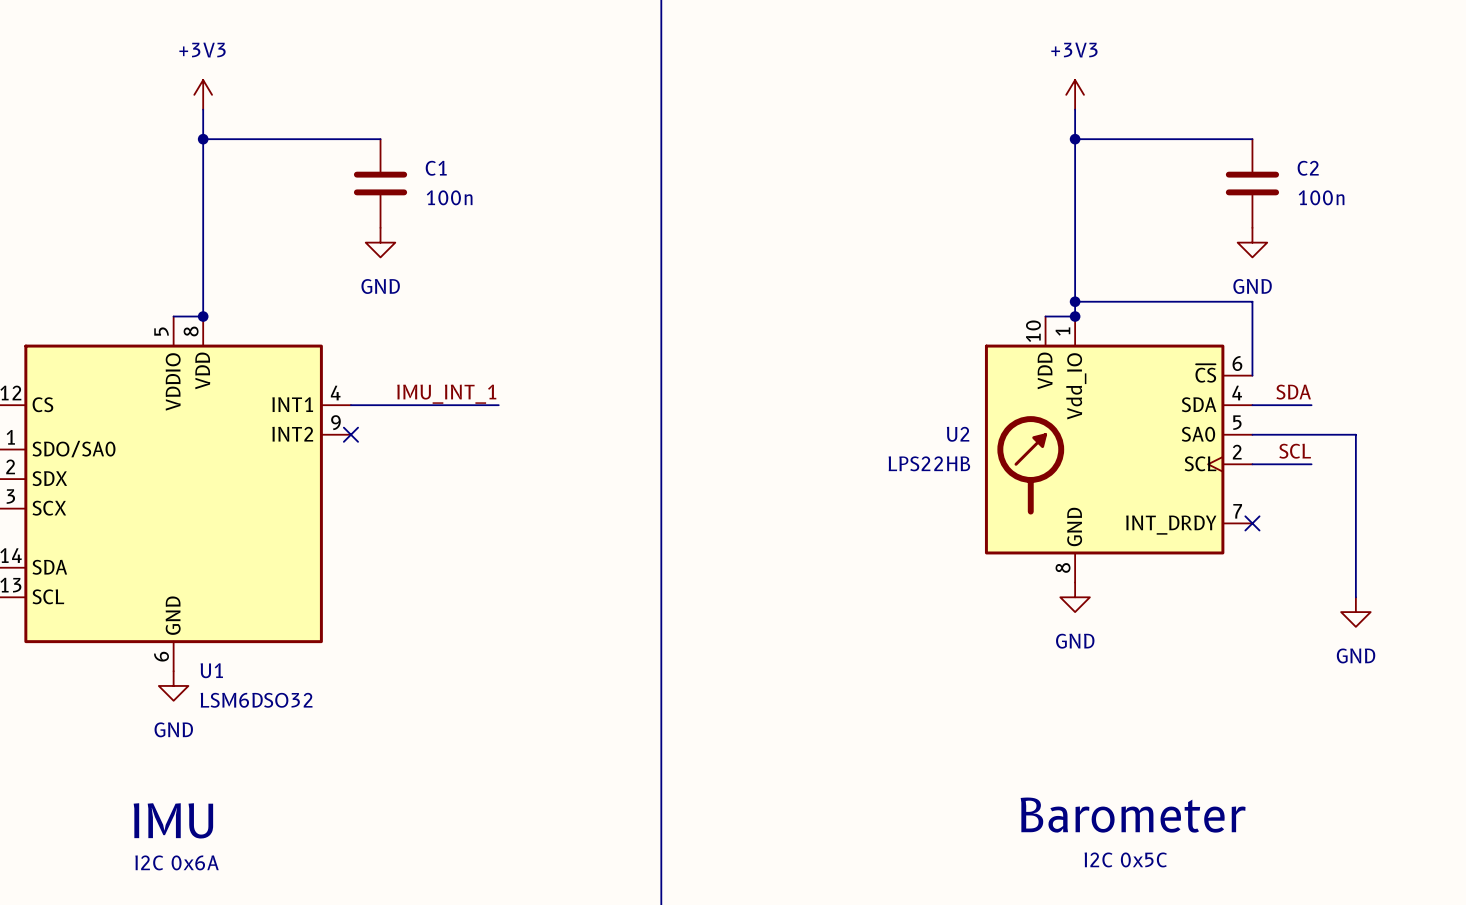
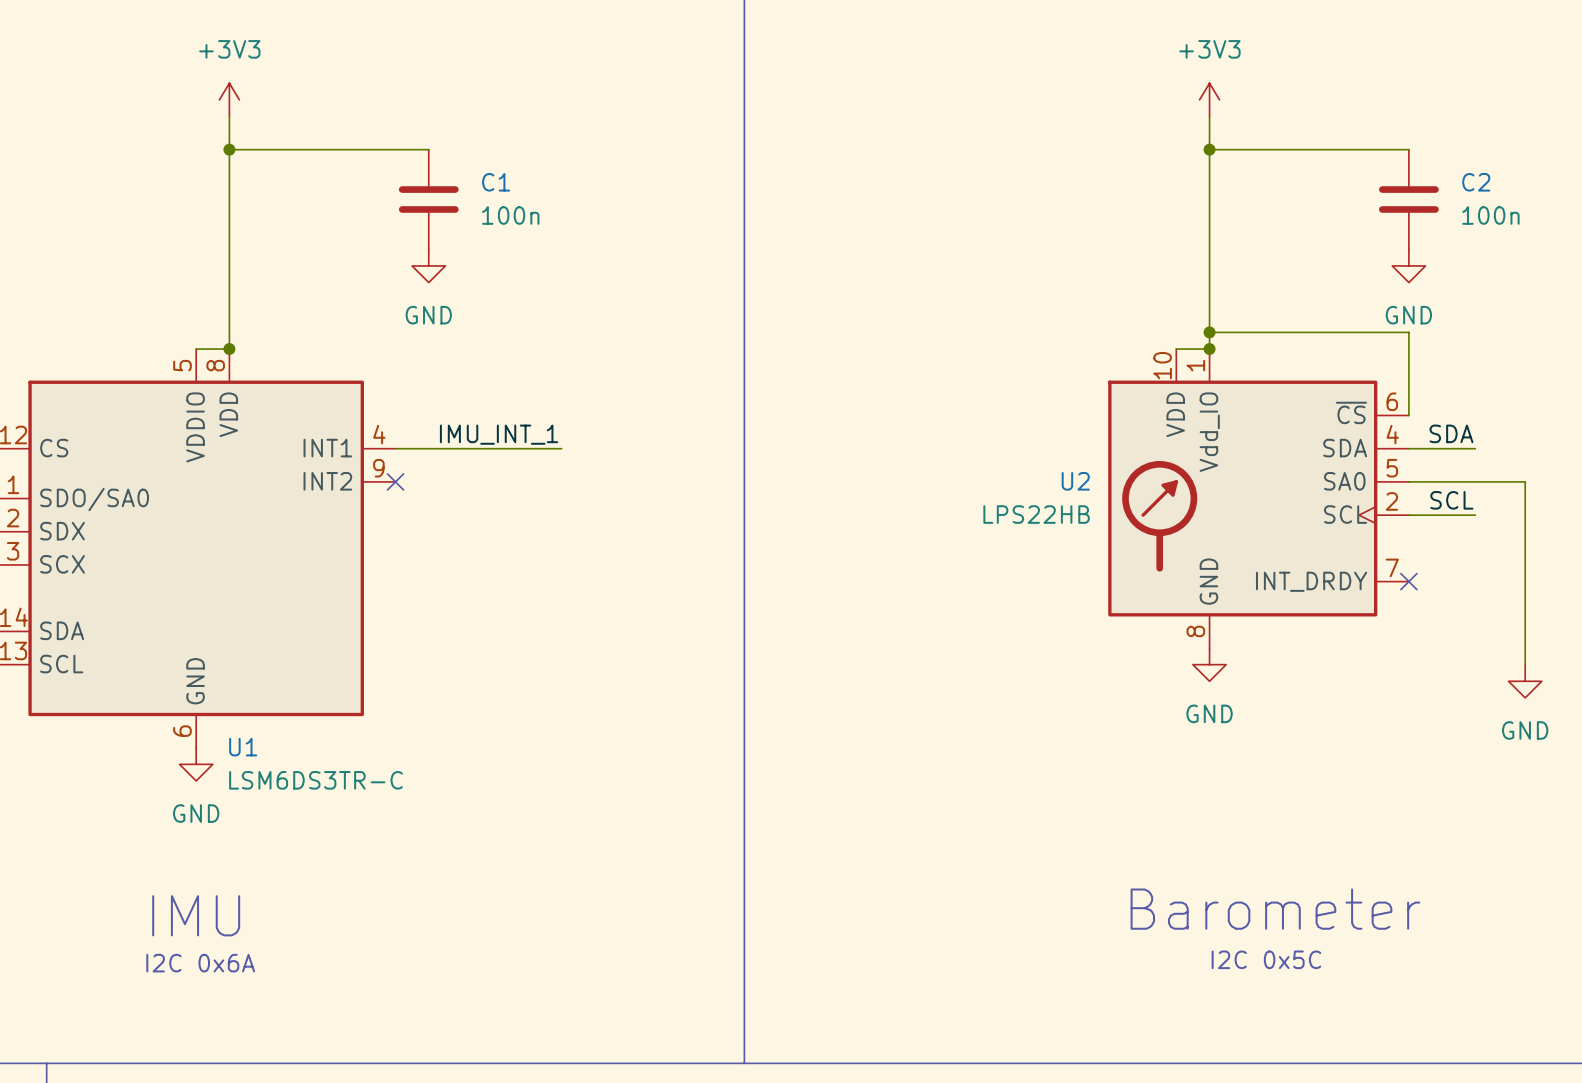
U1 value: LSM6DSO32 (256, 700) -> LSM6DS3TR-C (315, 780)

